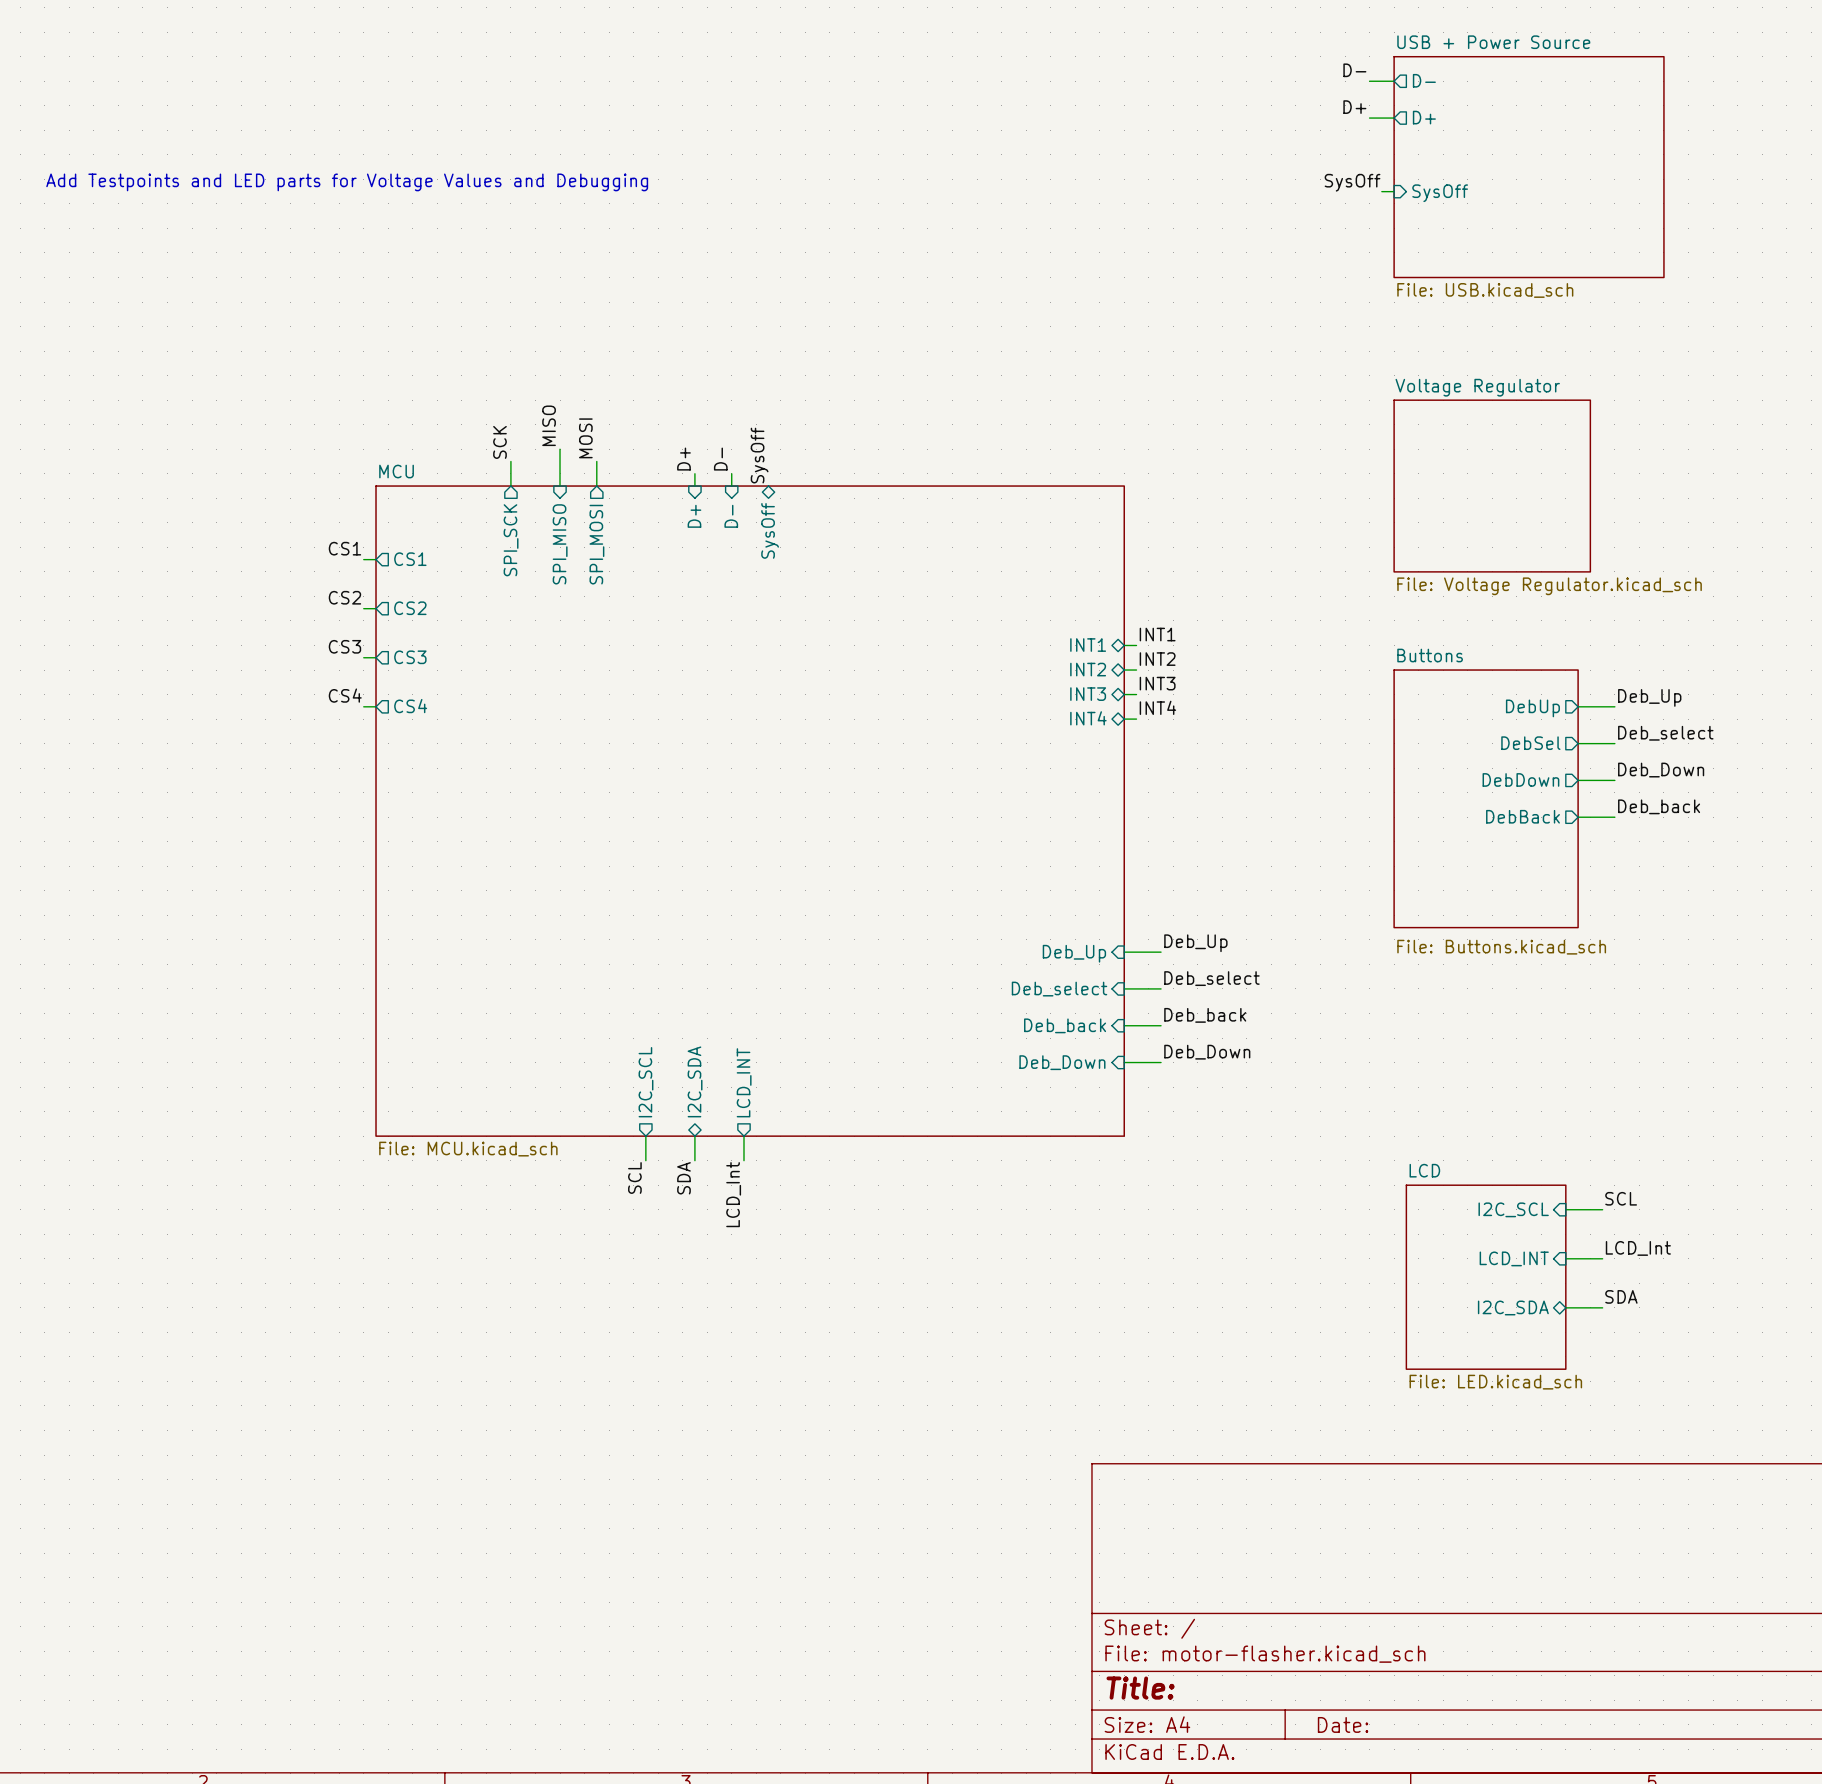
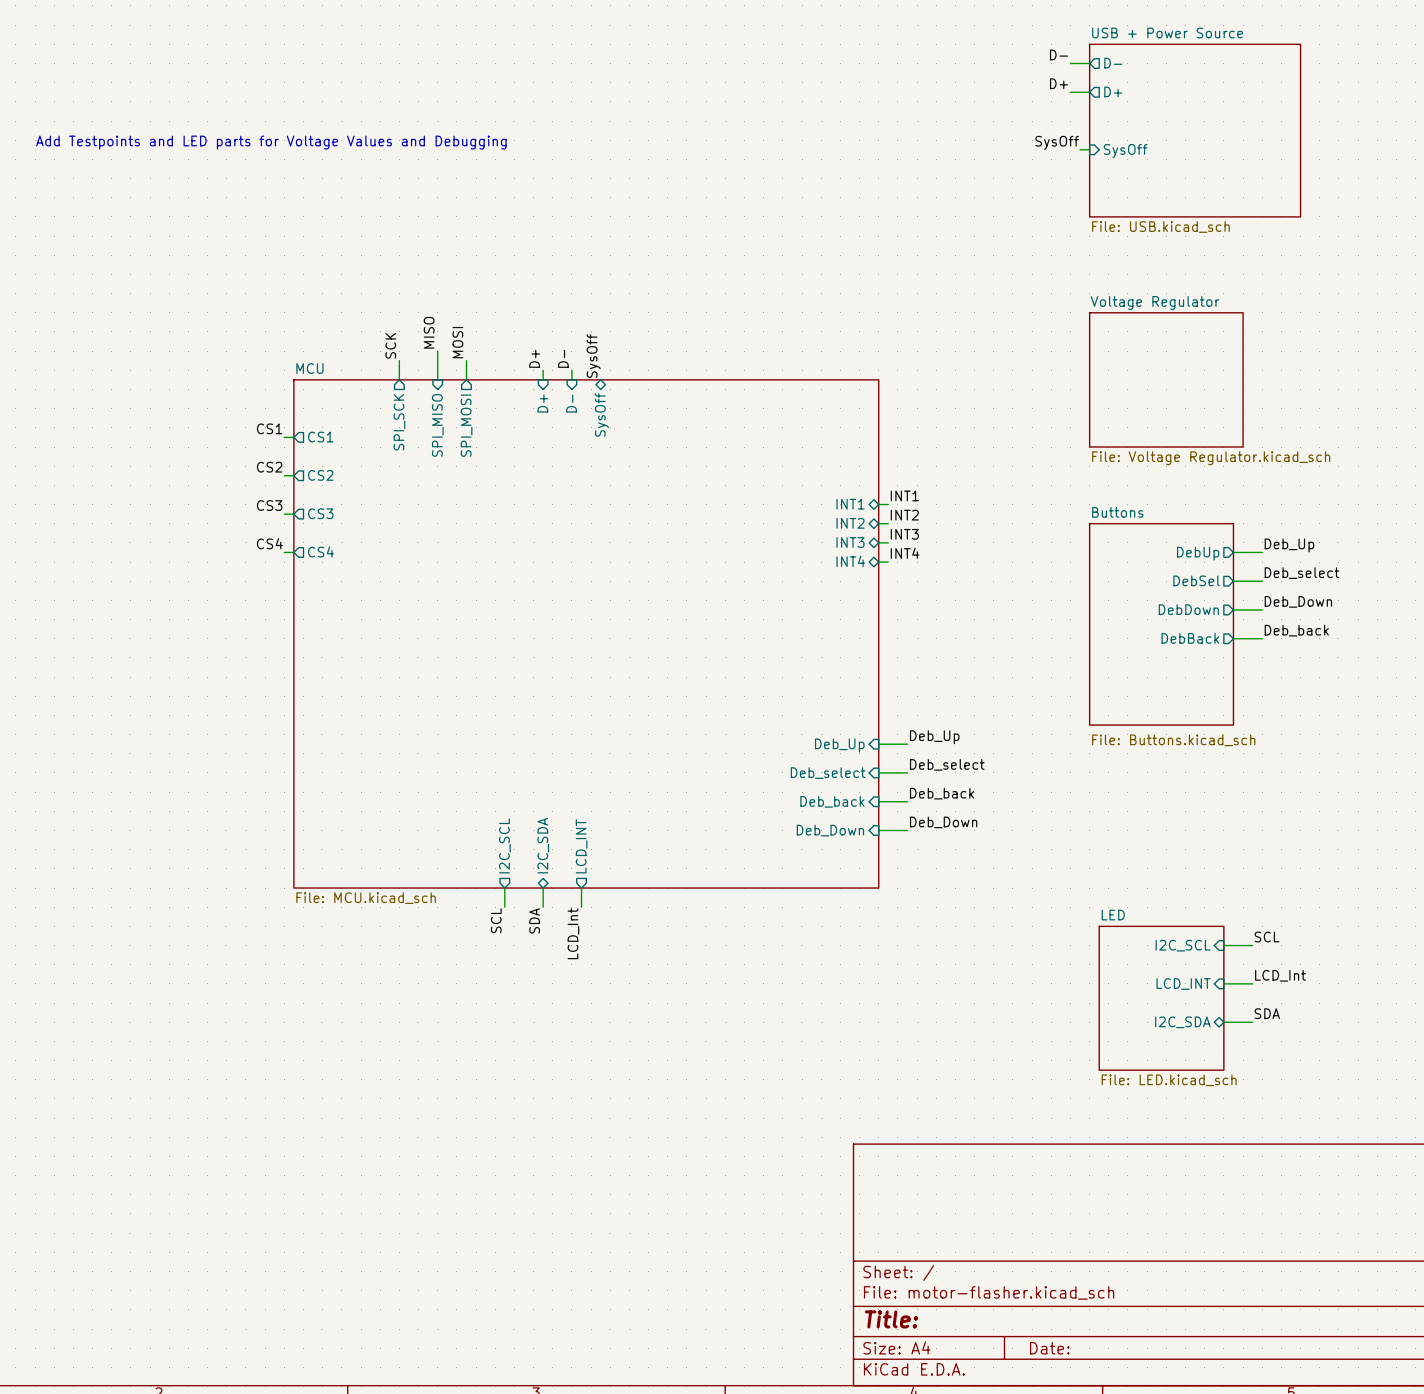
sheet LCD name: LCD (1424, 1170) -> LED (1113, 915)

